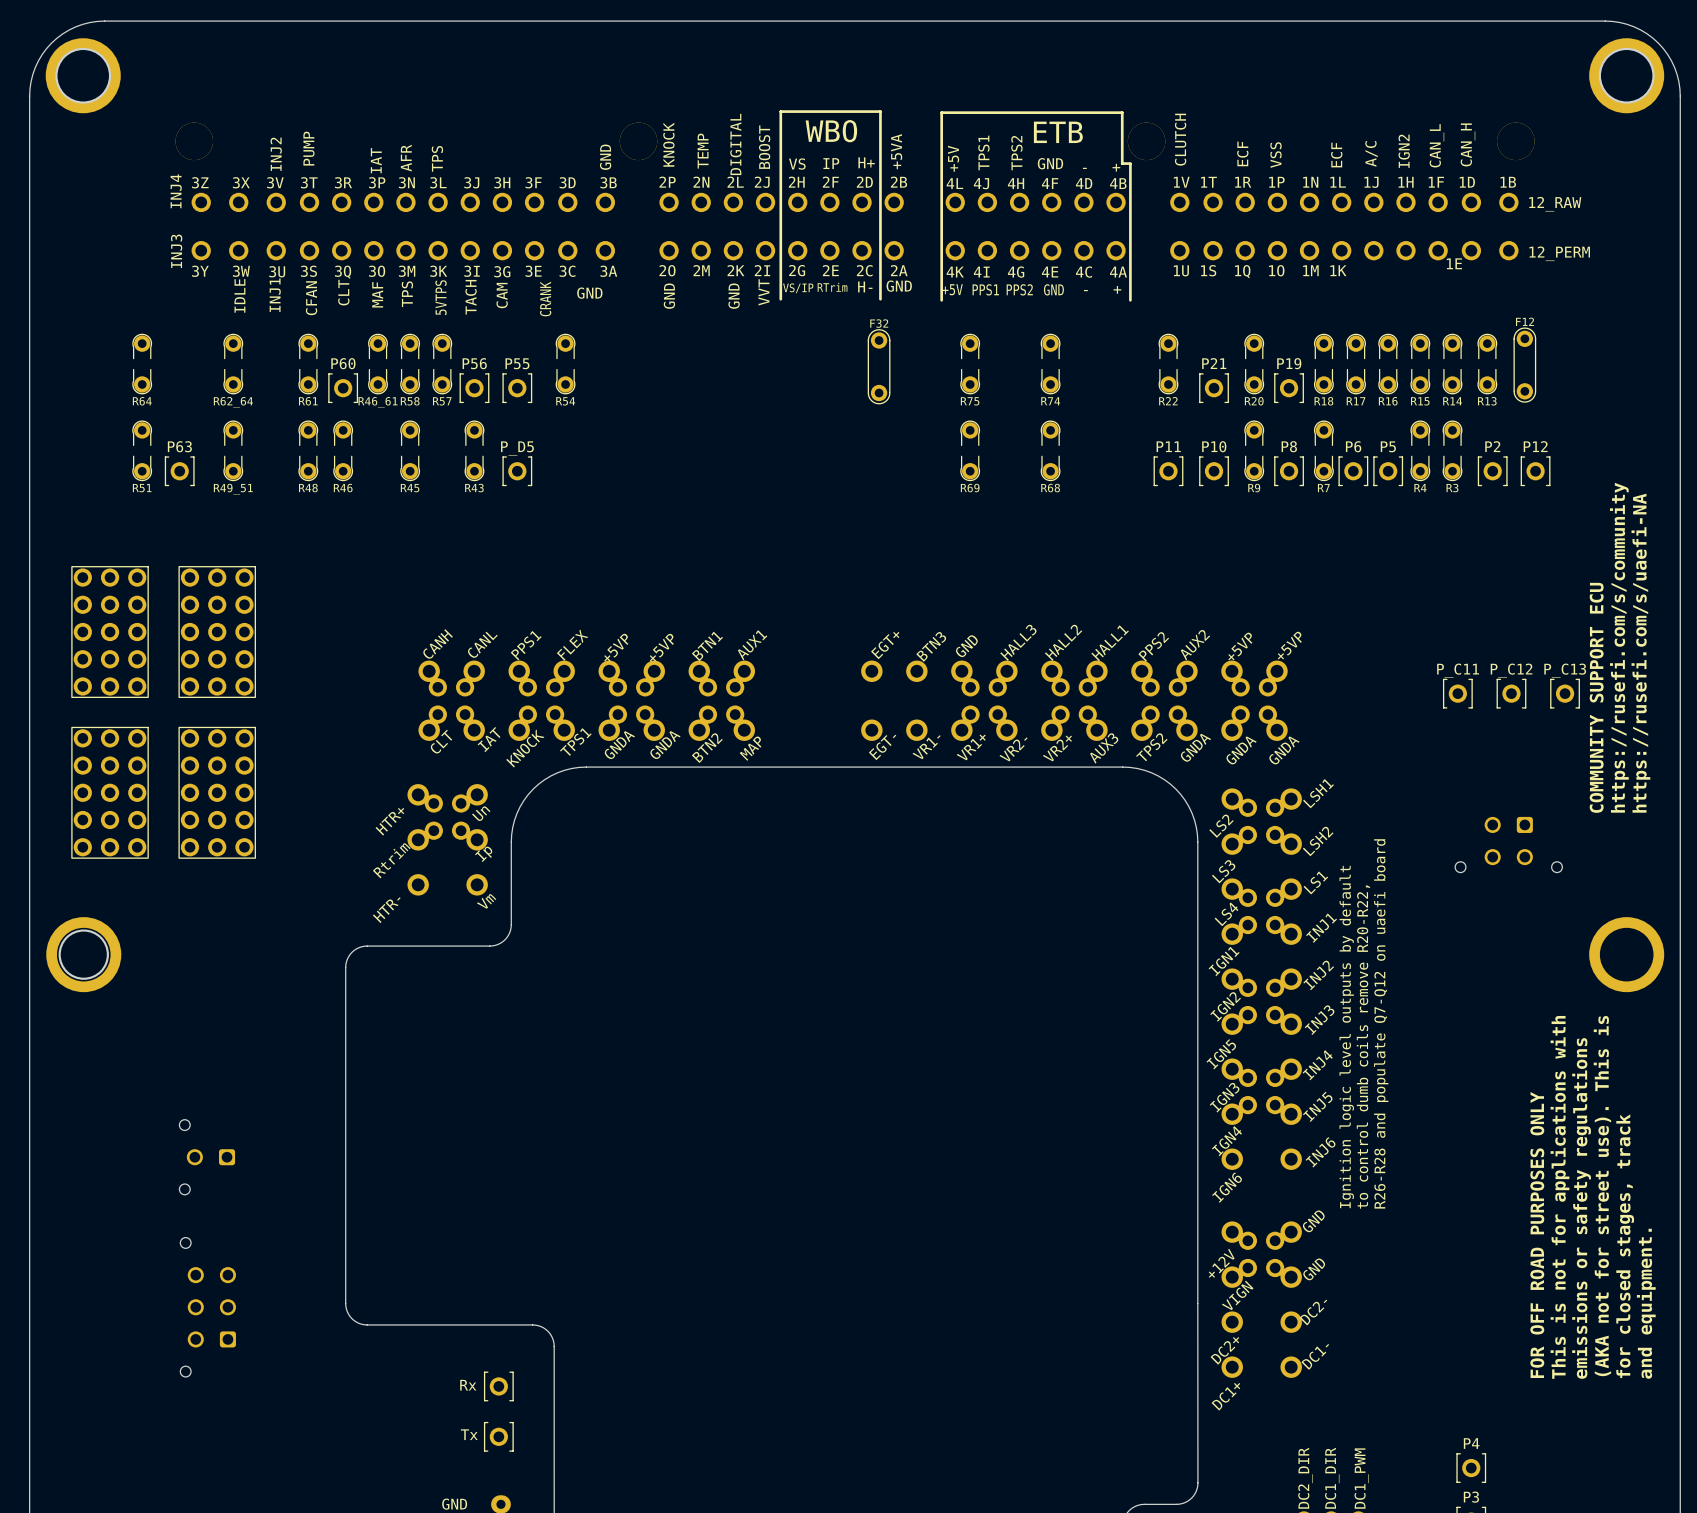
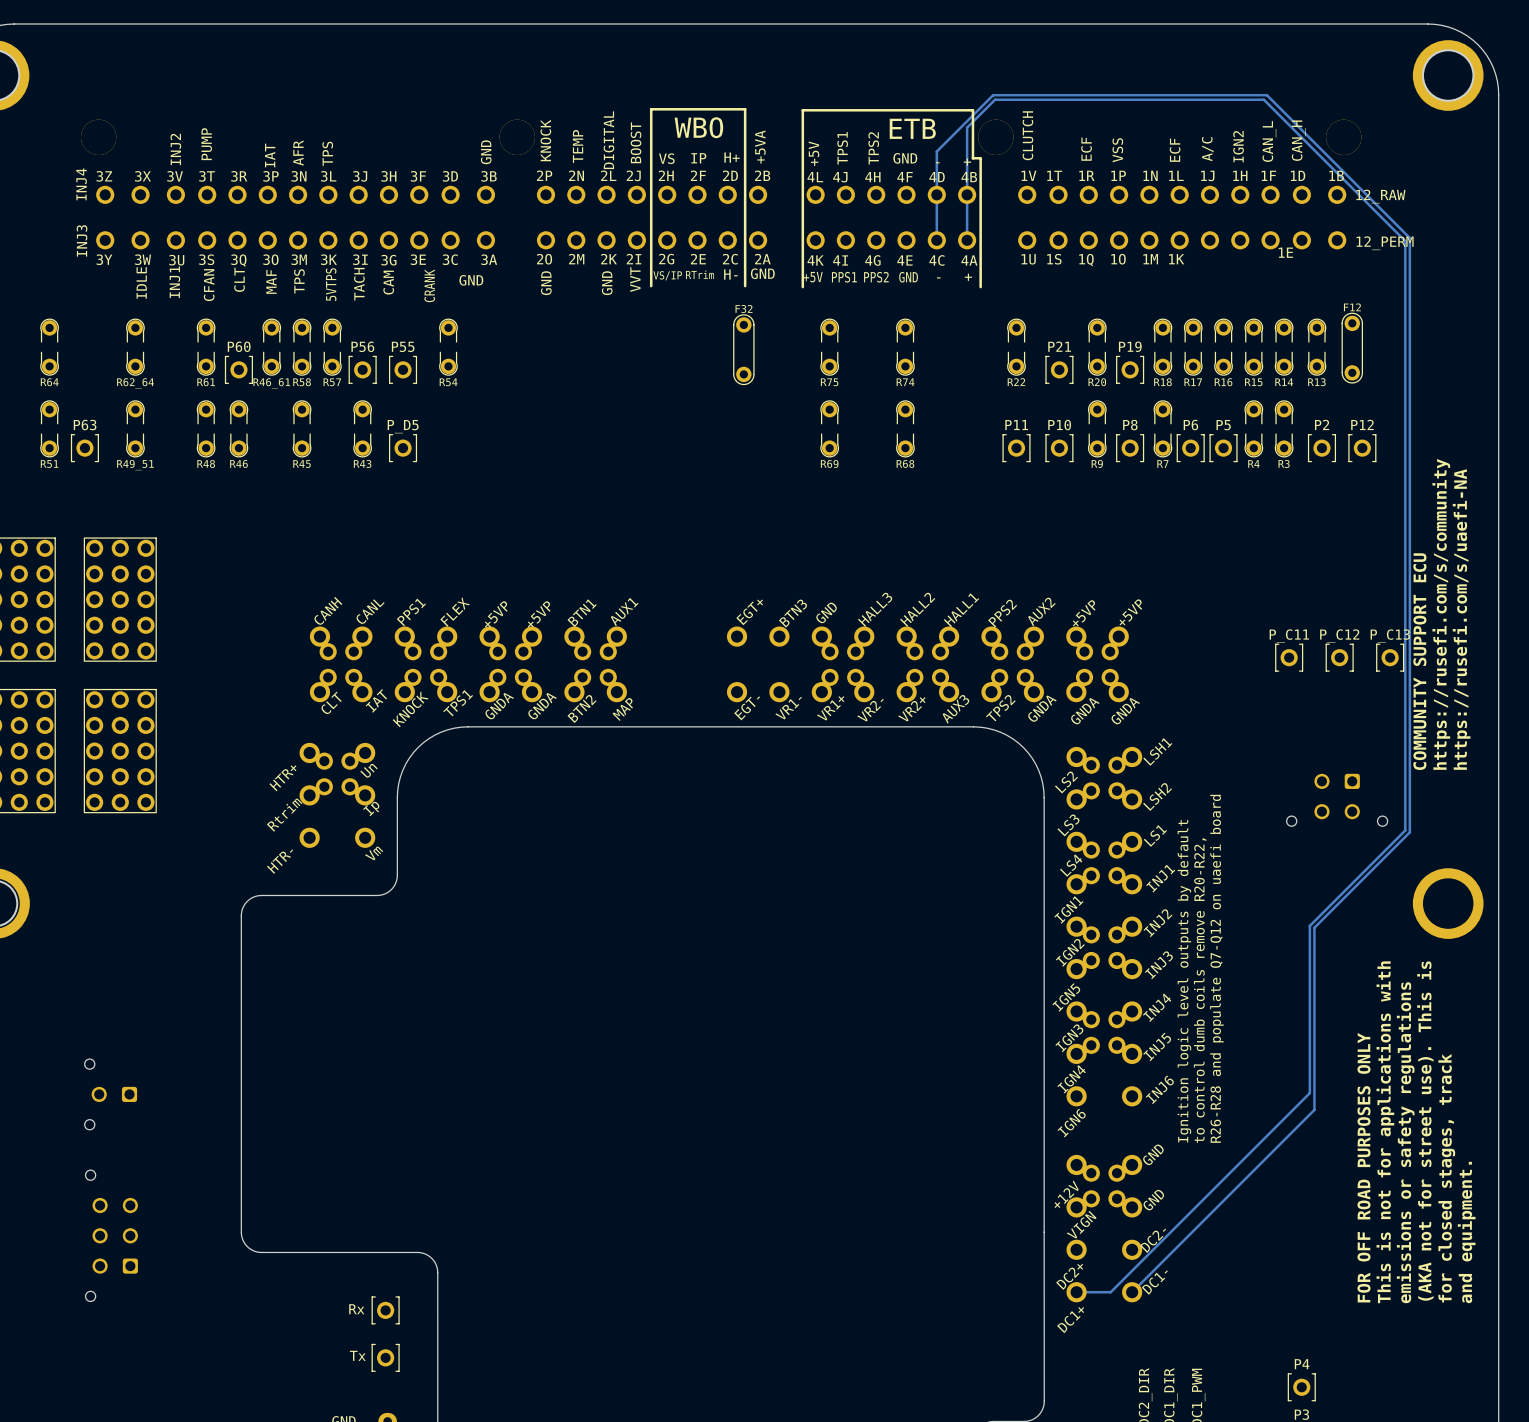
track: none -> (936, 240) (936, 151) (993, 95) (1266, 95) (1409, 238) (1409, 832) (1314, 927) (1314, 1109) (1132, 1292)
track: none -> (967, 240) (967, 127) (995, 99) (1263, 99) (1405, 241) (1405, 830) (1309, 925) (1309, 1093) (1110, 1292) (1076, 1292)

